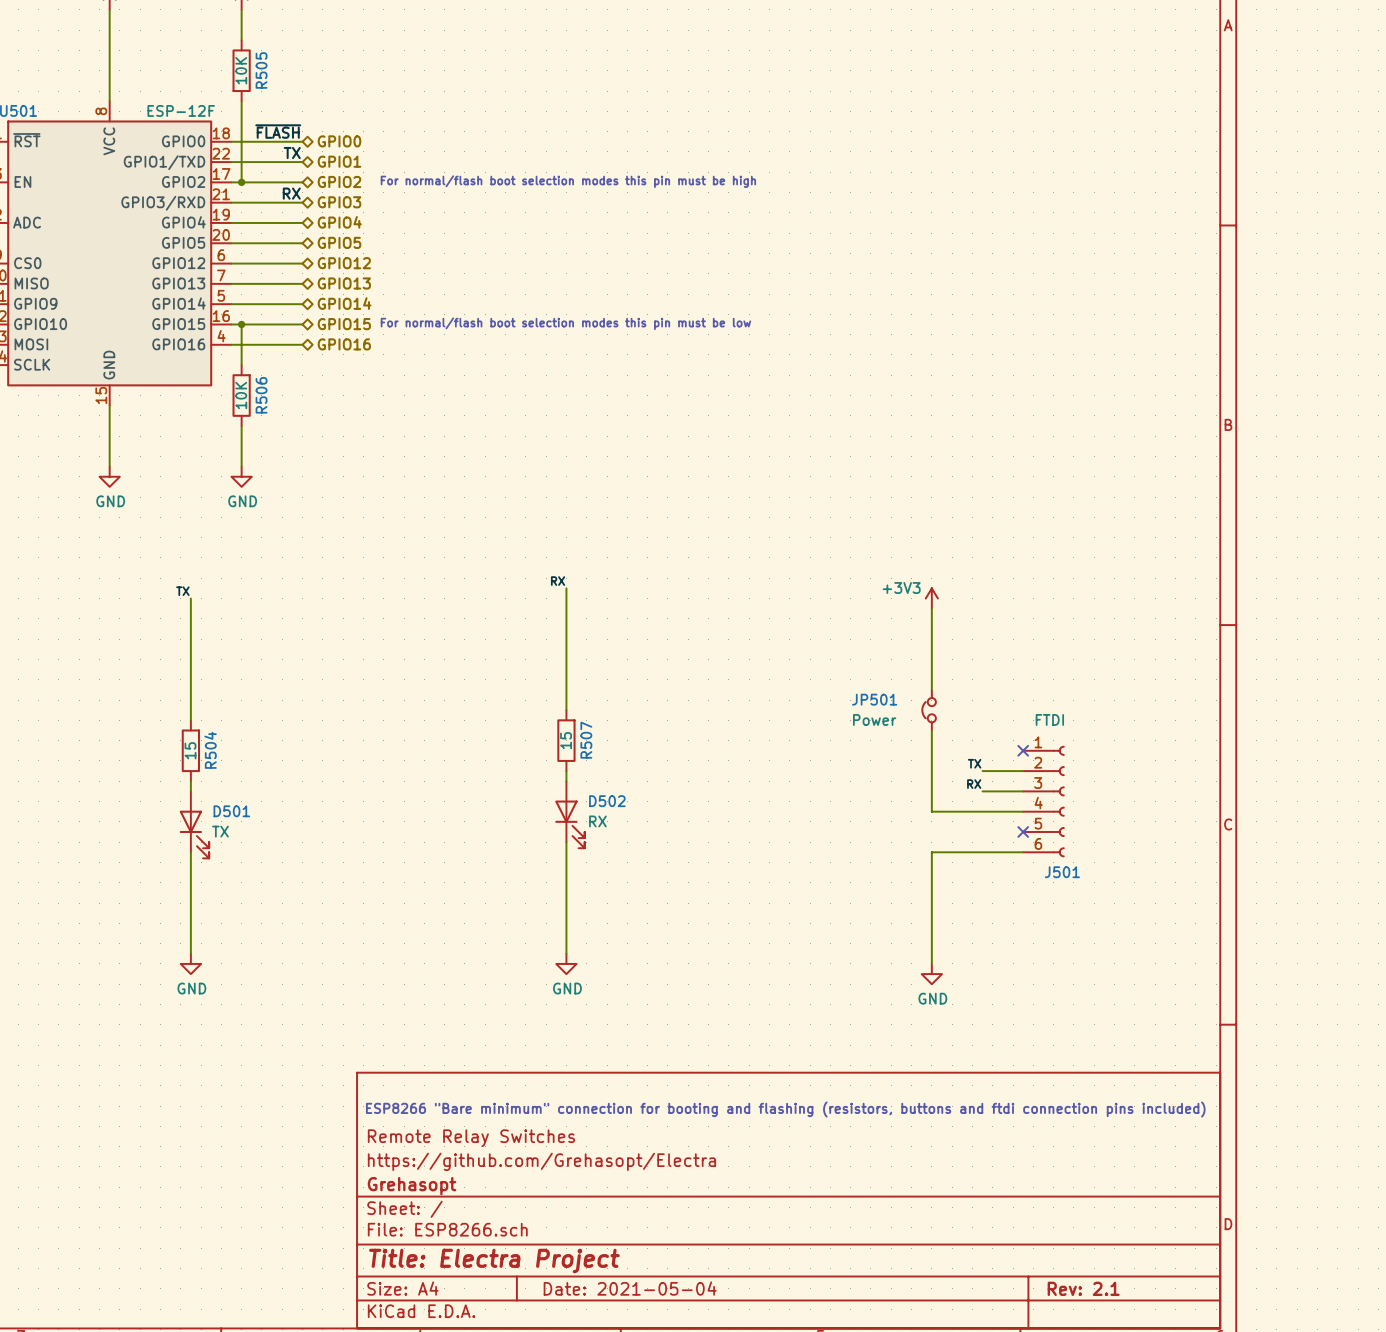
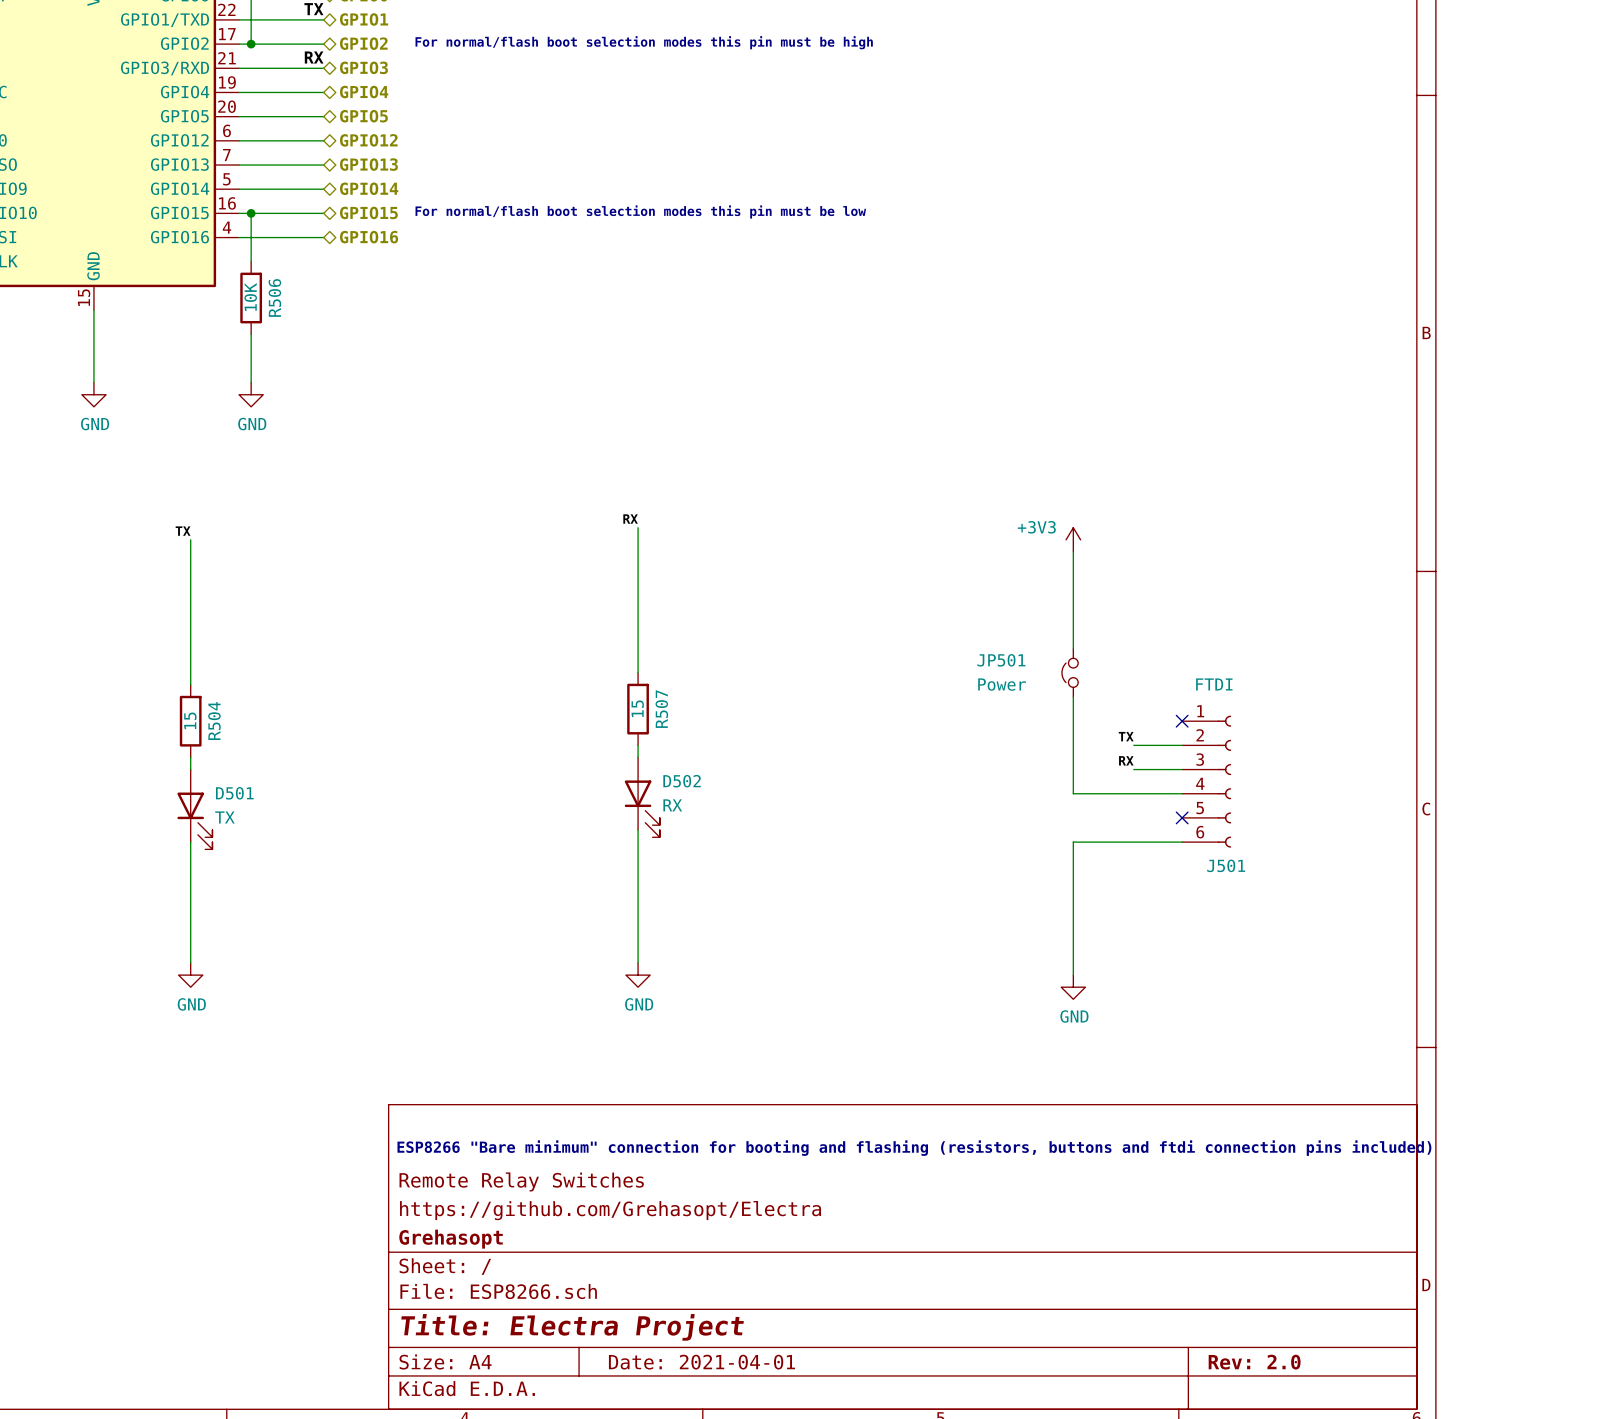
title block: Date: 2021-05-04 (630, 1288) -> Date: 2021-04-01 (701, 1362)
title block: Rev: 2.1 (1083, 1288) -> Rev: 2.0 (1254, 1362)

